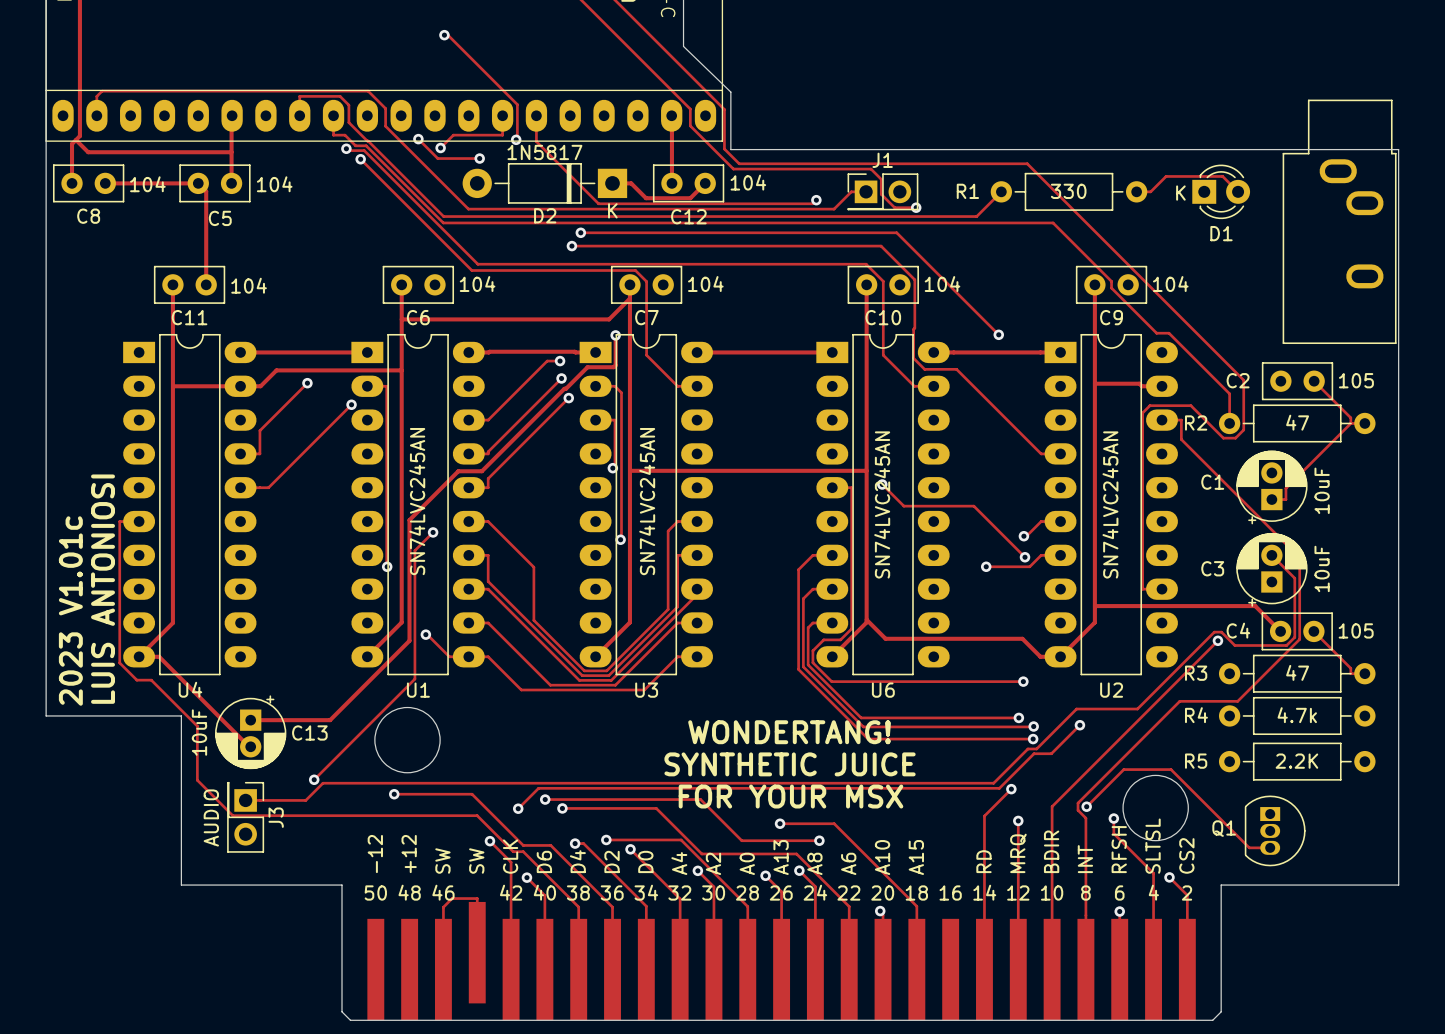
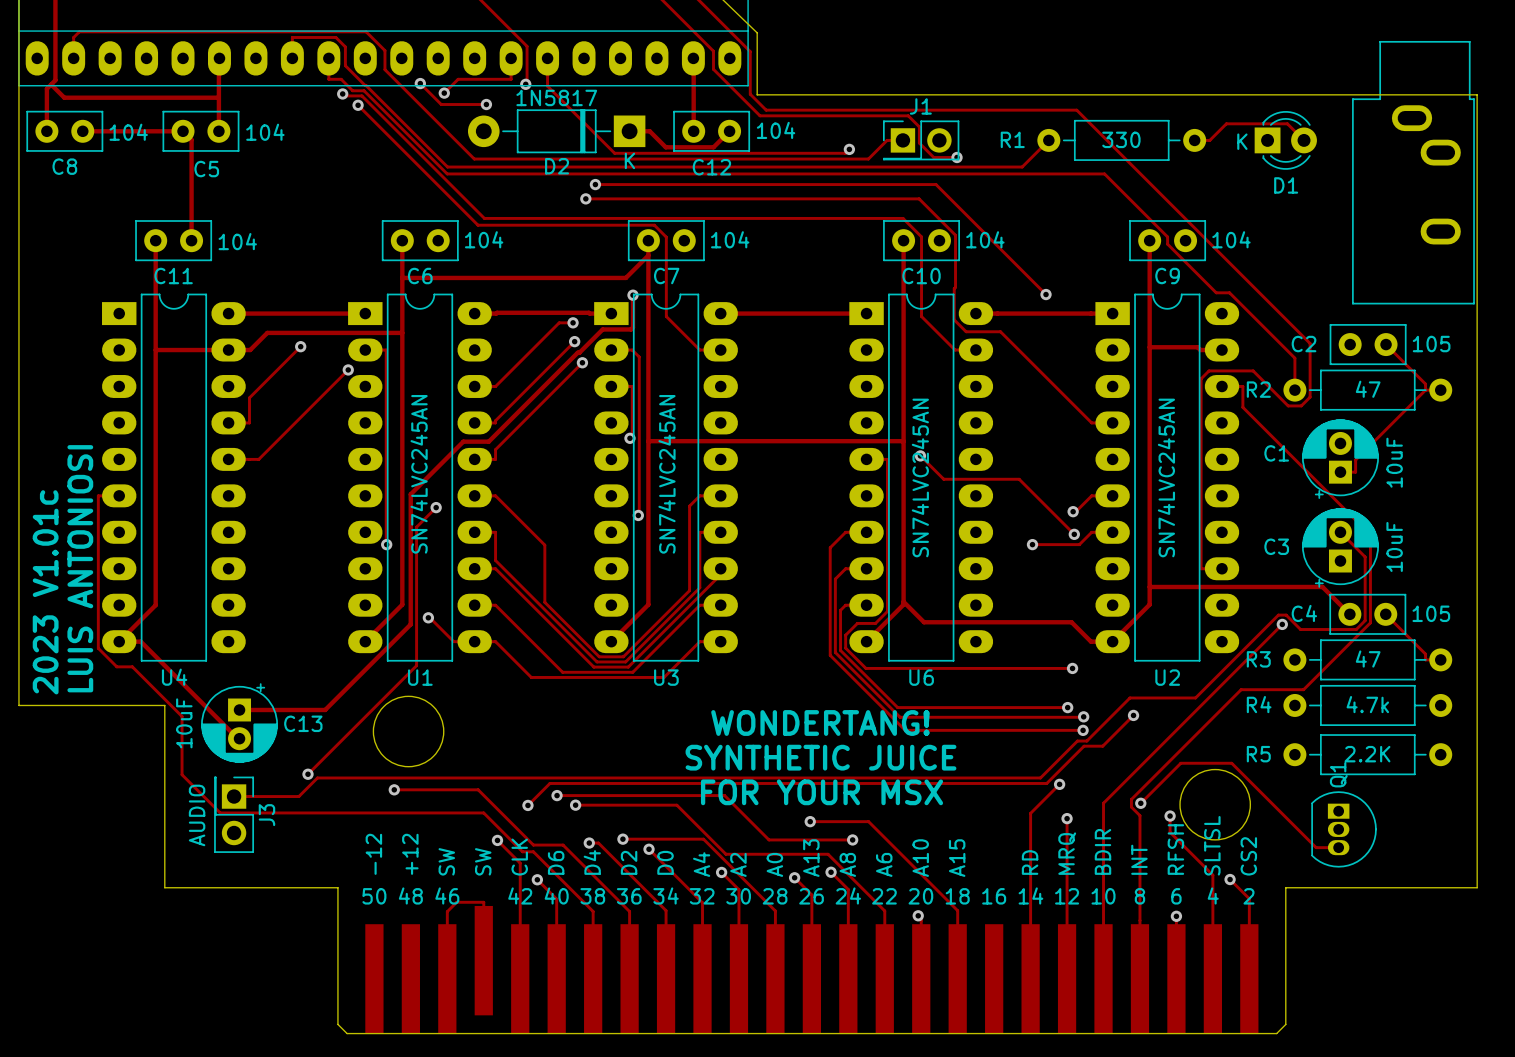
Q1 name rotation: 0° (1224, 828) -> 90° counterclockwise (1338, 774)
Q1 name position: Q1 (1224, 828) -> Q1 (1338, 774)

